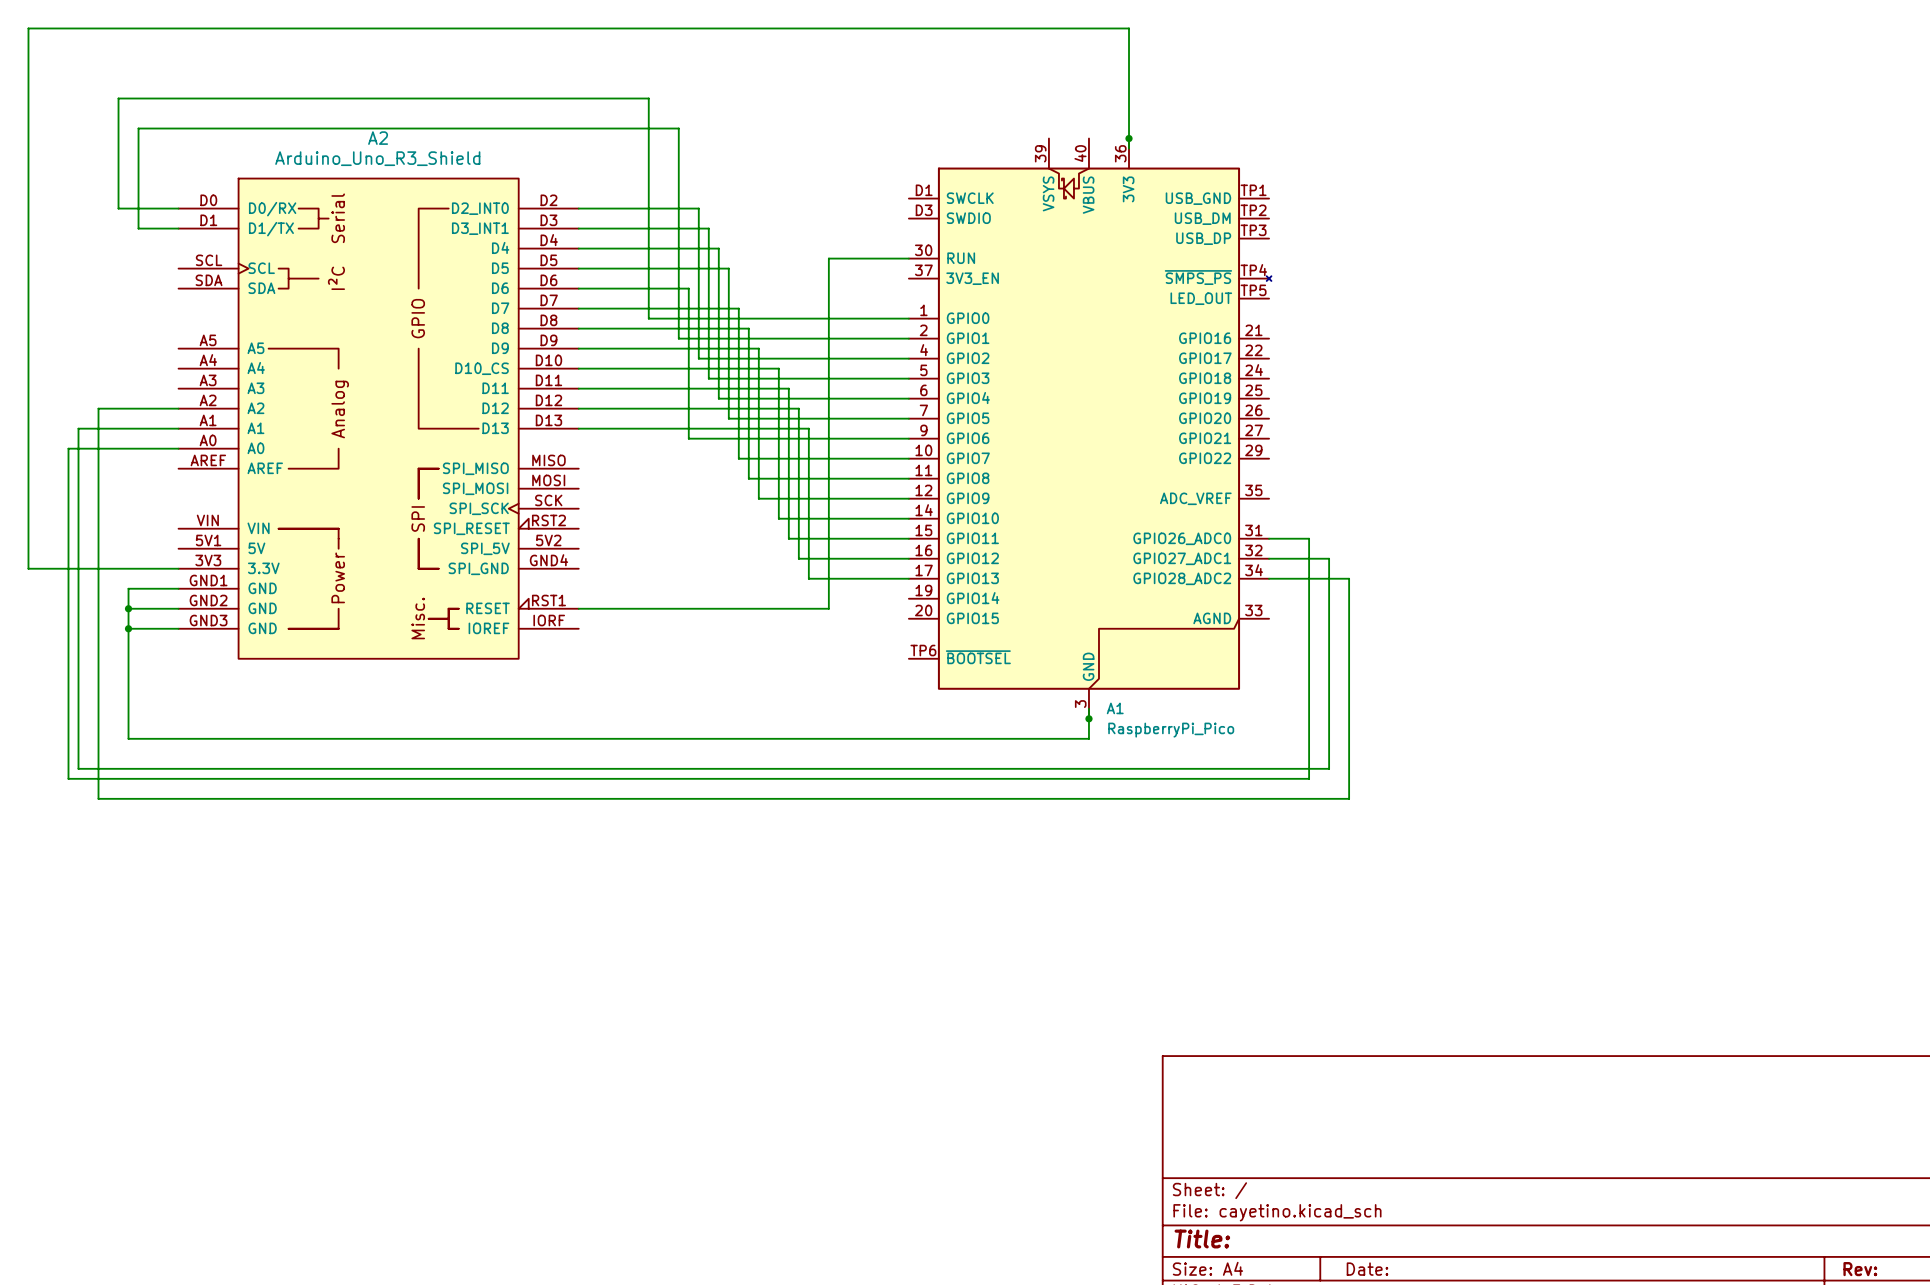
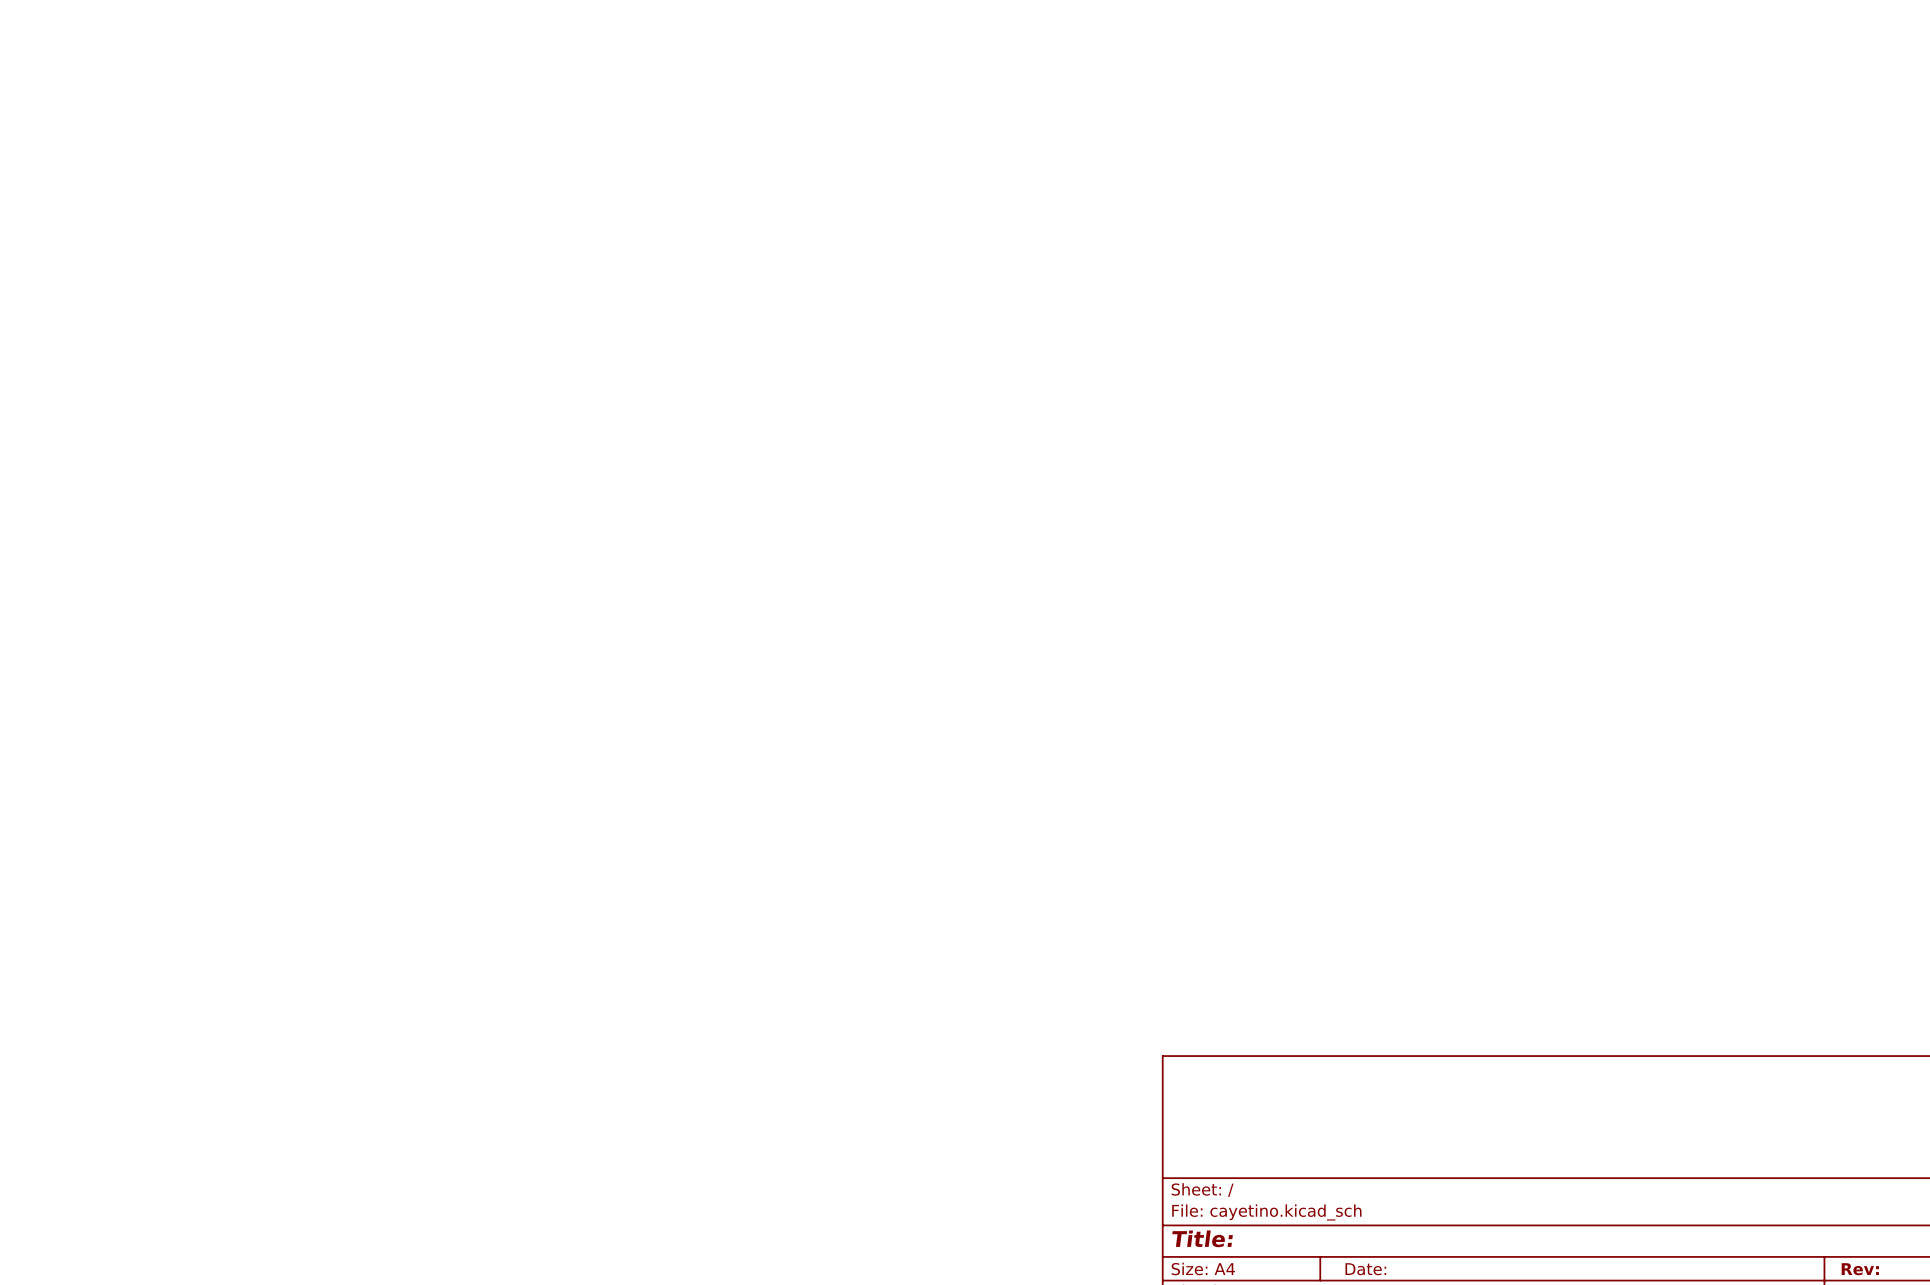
junction: (1129, 138) -> none
wire: (1129, 148) (1129, 28) (28, 28) (28, 568) (178, 568) -> none
wire: (178, 208) (118, 208) (118, 98) (648, 98) (648, 318) (908, 318) -> none
wire: (578, 208) (698, 208) (698, 358) (908, 358) -> none
wire: (178, 228) (138, 228) (138, 128) (678, 128) (678, 338) (908, 338) -> none
wire: (578, 228) (708, 228) (708, 378) (908, 378) -> none
wire: (578, 248) (718, 248) (718, 398) (908, 398) -> none
wire: (908, 258) (828, 258) (828, 608) (578, 608) -> none
wire: (578, 268) (728, 268) (728, 418) (908, 418) -> none
wire: (578, 288) (688, 288) (688, 438) (908, 438) -> none
wire: (578, 308) (738, 308) (738, 458) (908, 458) -> none
wire: (578, 328) (748, 328) (748, 478) (908, 478) -> none
wire: (578, 348) (758, 348) (758, 498) (908, 498) -> none
wire: (578, 368) (778, 368) (778, 518) (908, 518) -> none
wire: (578, 388) (788, 388) (788, 538) (908, 538) -> none
wire: (178, 408) (98, 408) (98, 798) (1349, 798) (1349, 578) (1269, 578) -> none
wire: (578, 408) (798, 408) (798, 558) (908, 558) -> none
A2: Arduino_Uno_R3_Shield (378, 418) -> none
wire: (178, 428) (78, 428) (78, 768) (1329, 768) (1329, 558) (1269, 558) -> none
wire: (578, 428) (808, 428) (808, 578) (908, 578) -> none
A1: RaspberryPi_Pico (1090, 428) -> none
wire: (178, 448) (68, 448) (68, 778) (1309, 778) (1309, 538) (1269, 538) -> none
wire: (178, 588) (128, 588) (128, 738) (1088, 738) (1088, 708) -> none
wire: (128, 608) (178, 608) -> none
junction: (128, 608) -> none
wire: (128, 628) (178, 628) -> none
junction: (128, 628) -> none
junction: (1088, 718) -> none

